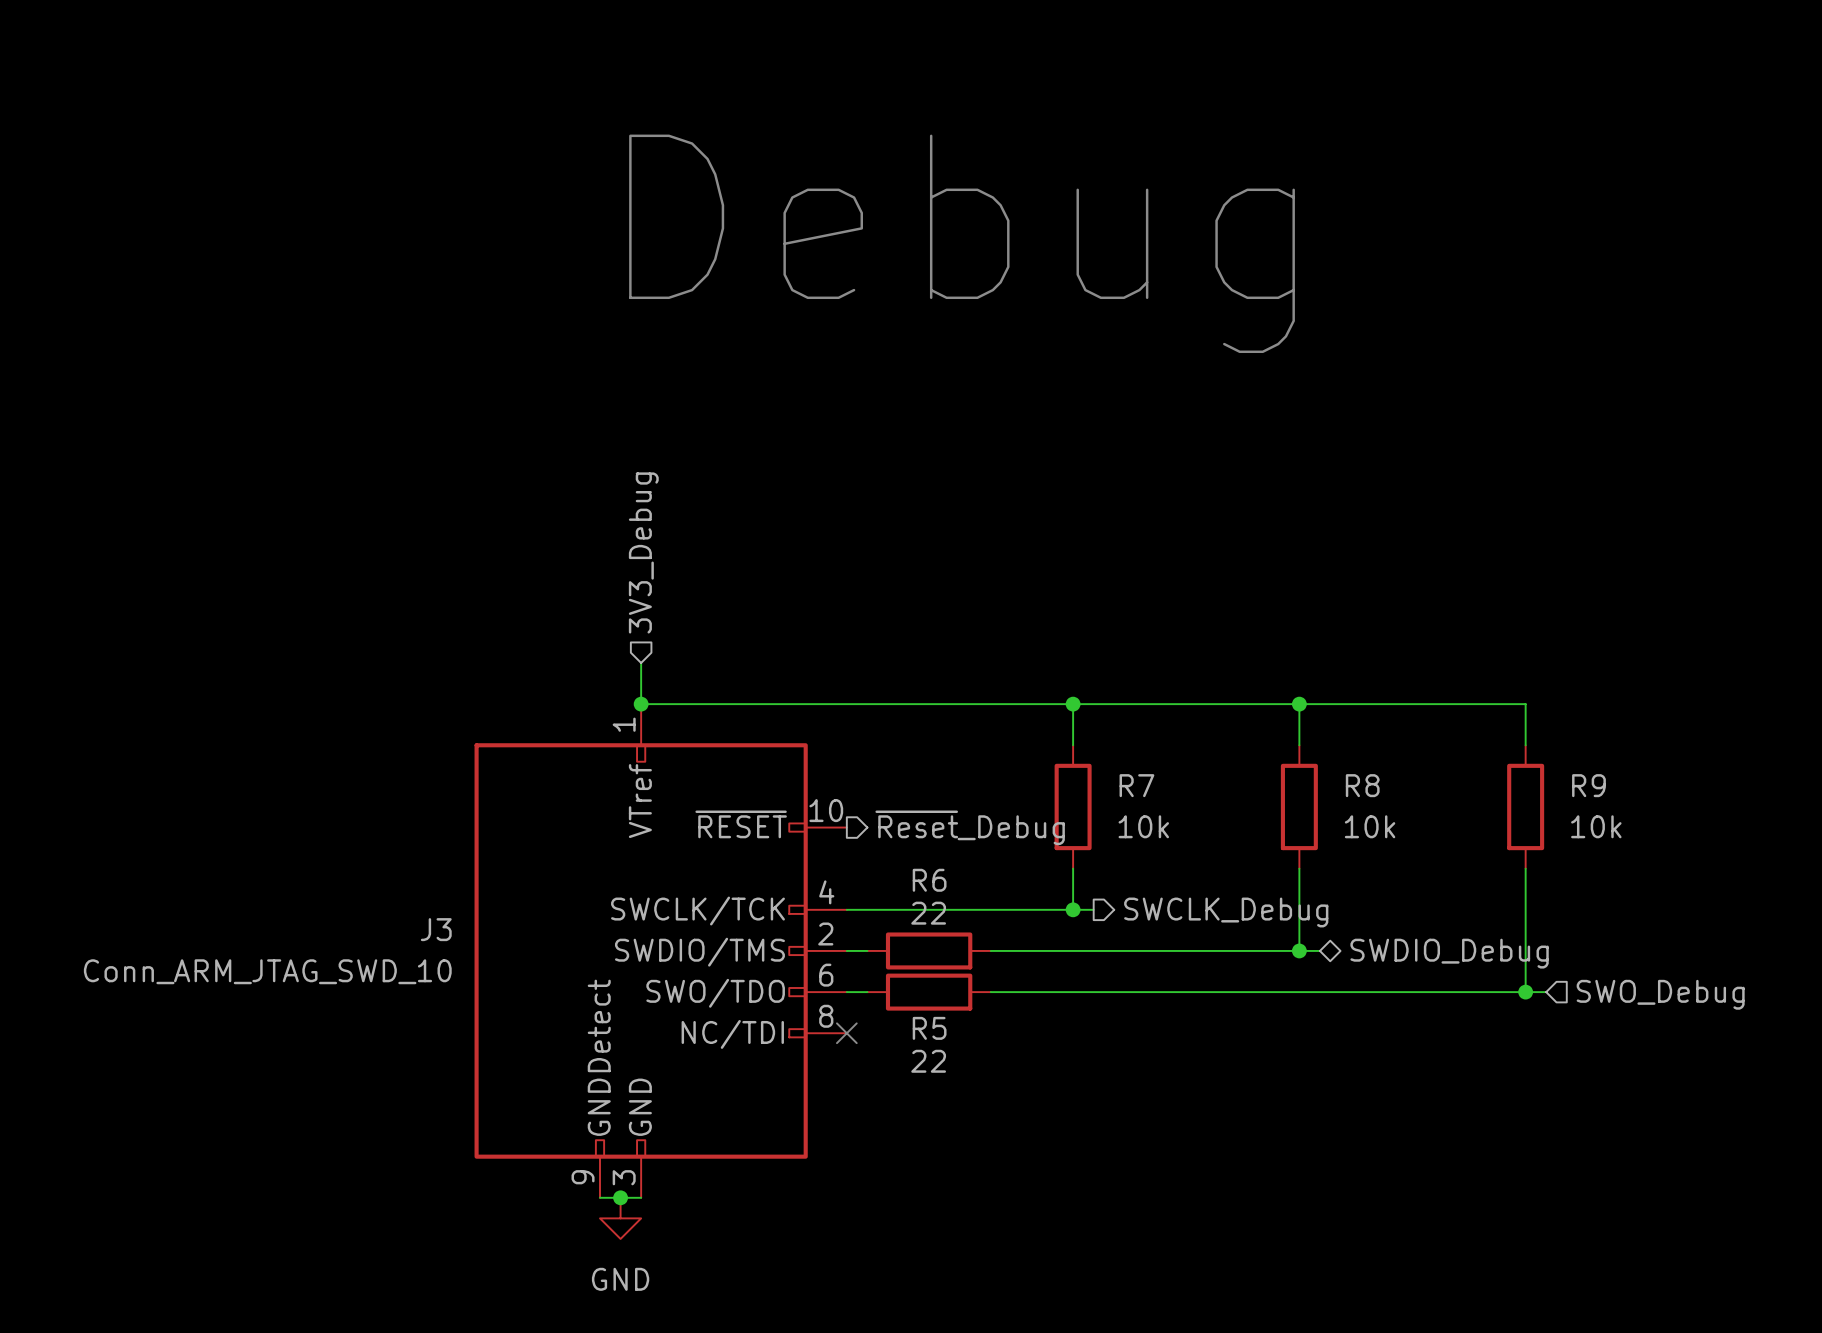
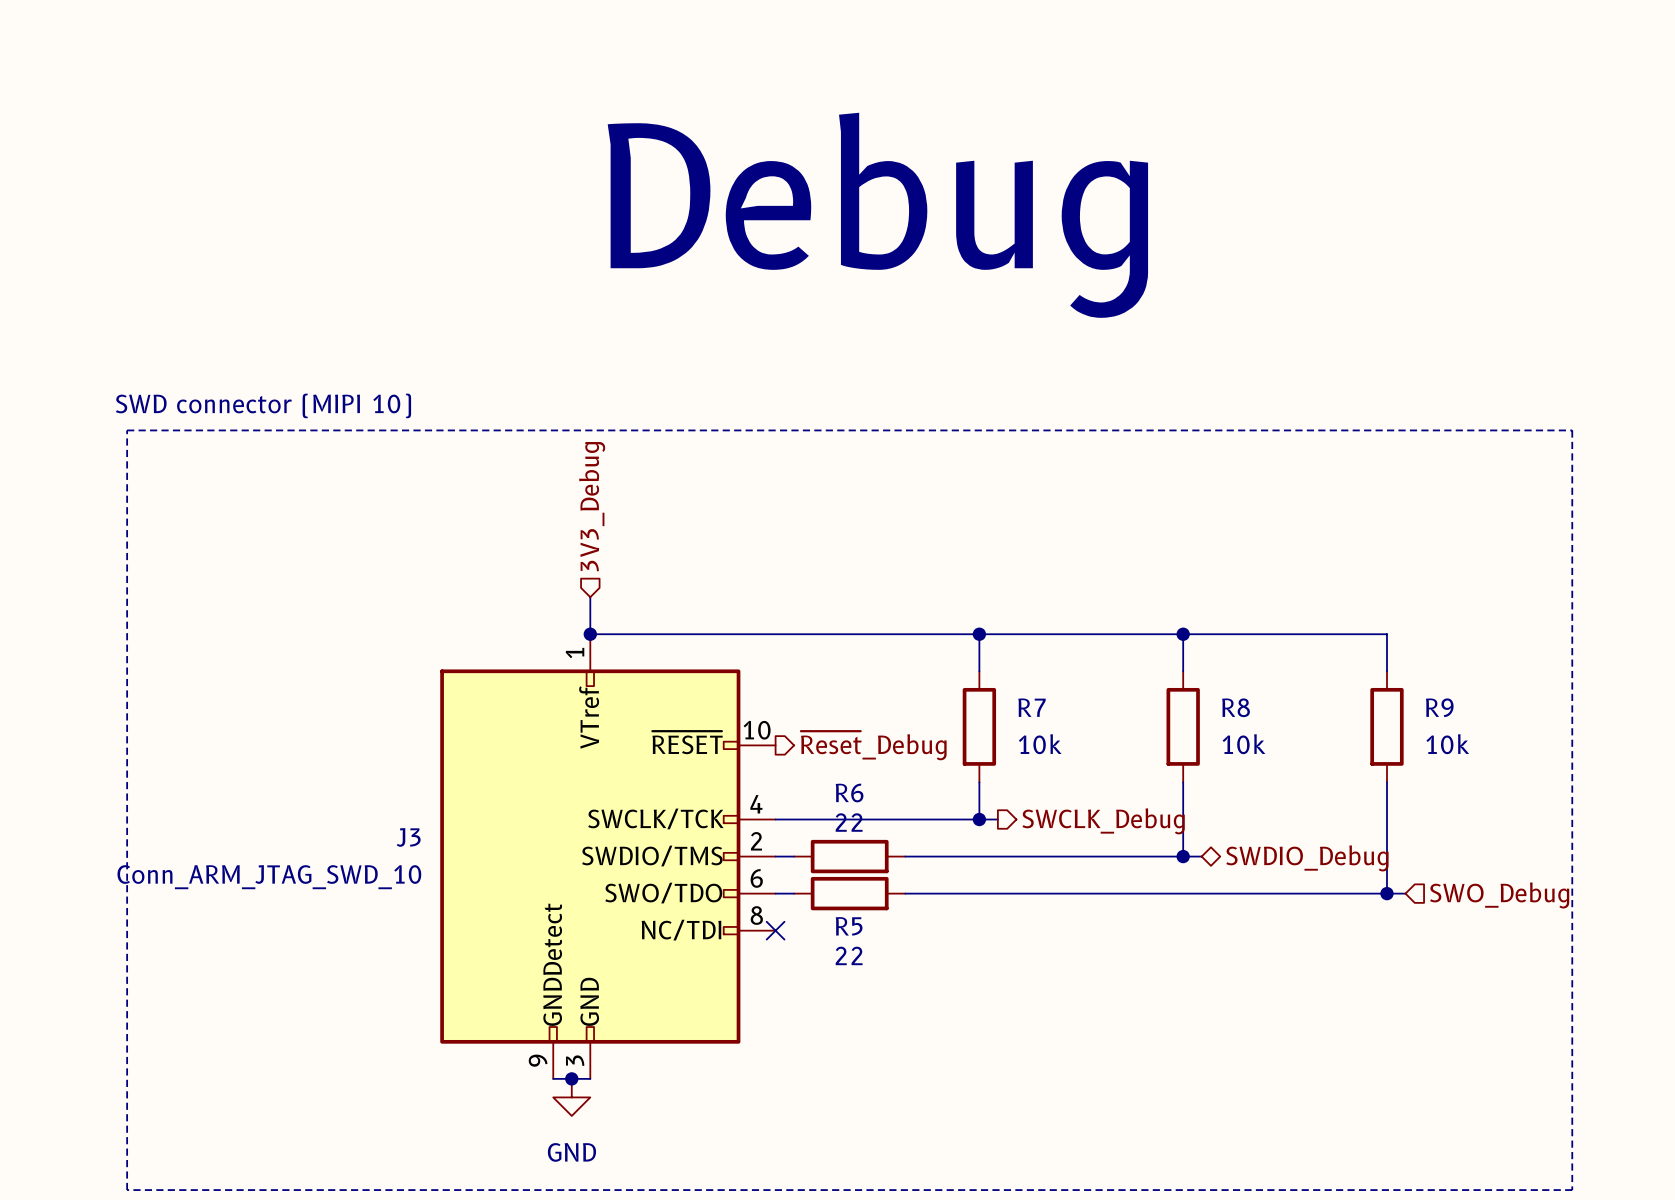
text: none -> SWD connector (MIPI 10) (263, 405)
line: none -> (127, 430) (1572, 430) (1572, 1190) (127, 1190) (127, 430)

